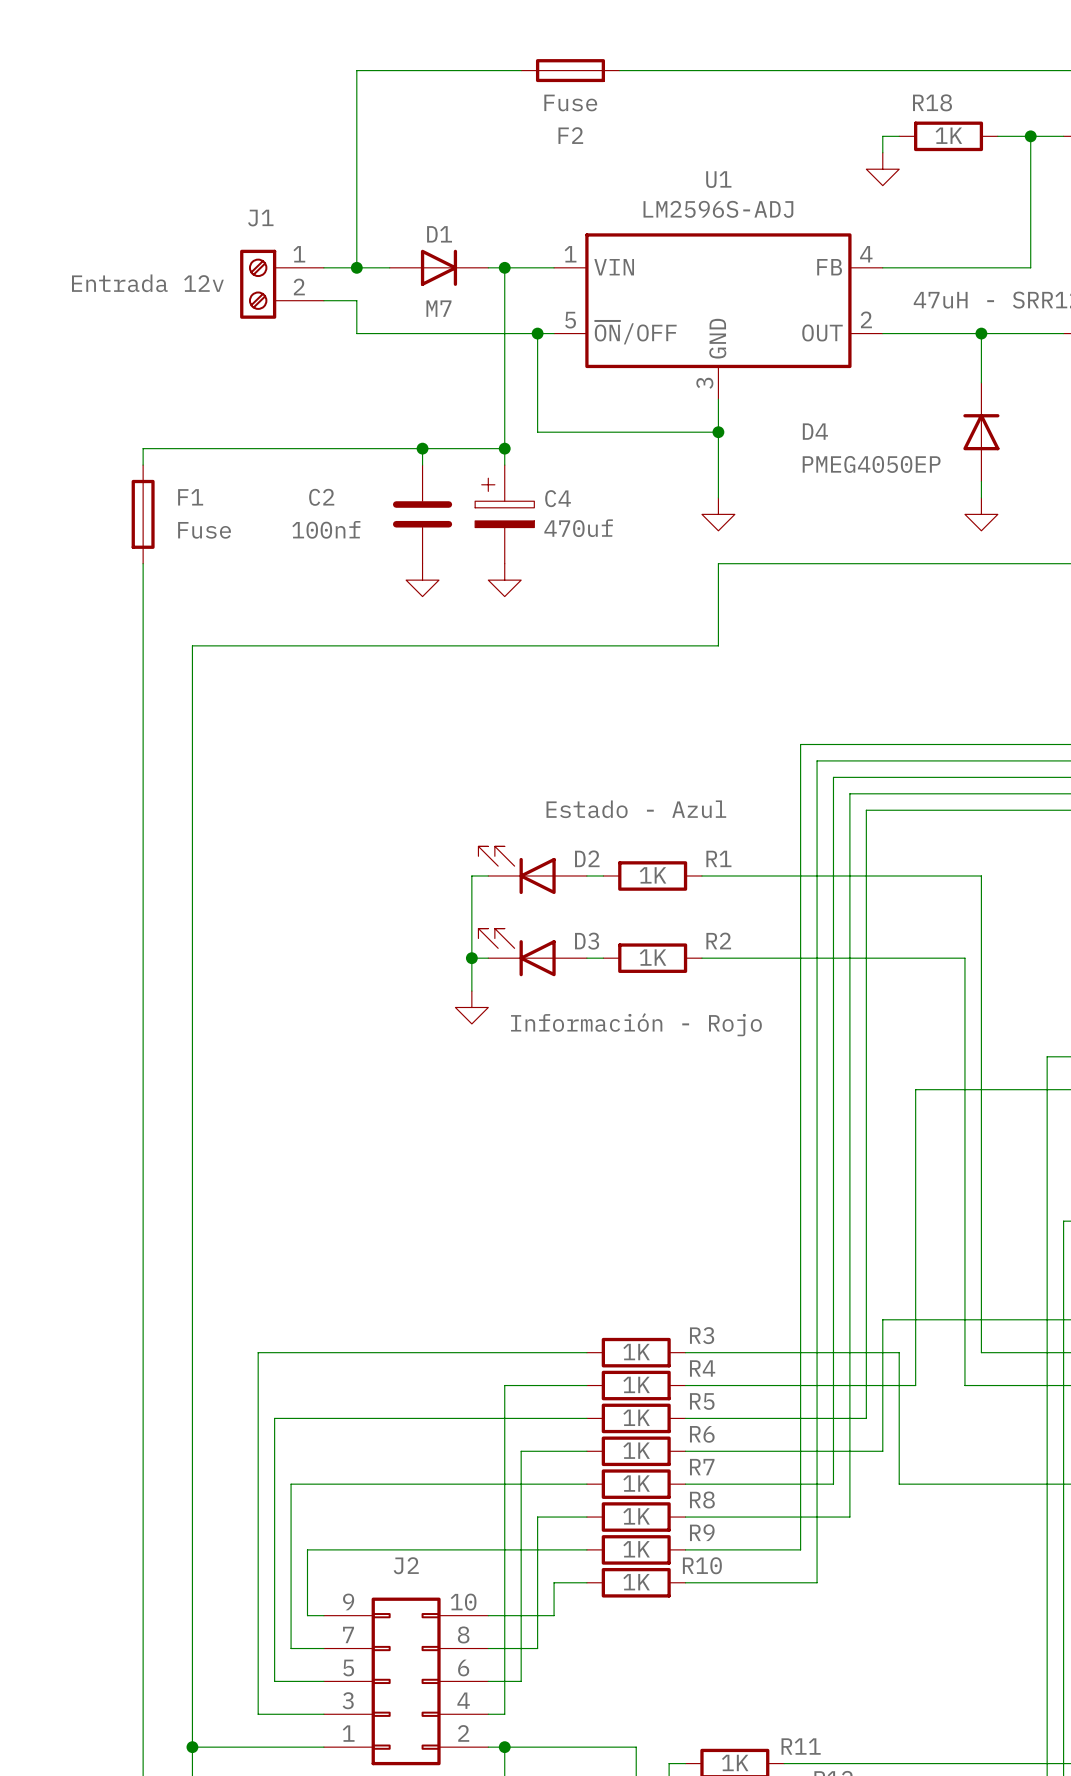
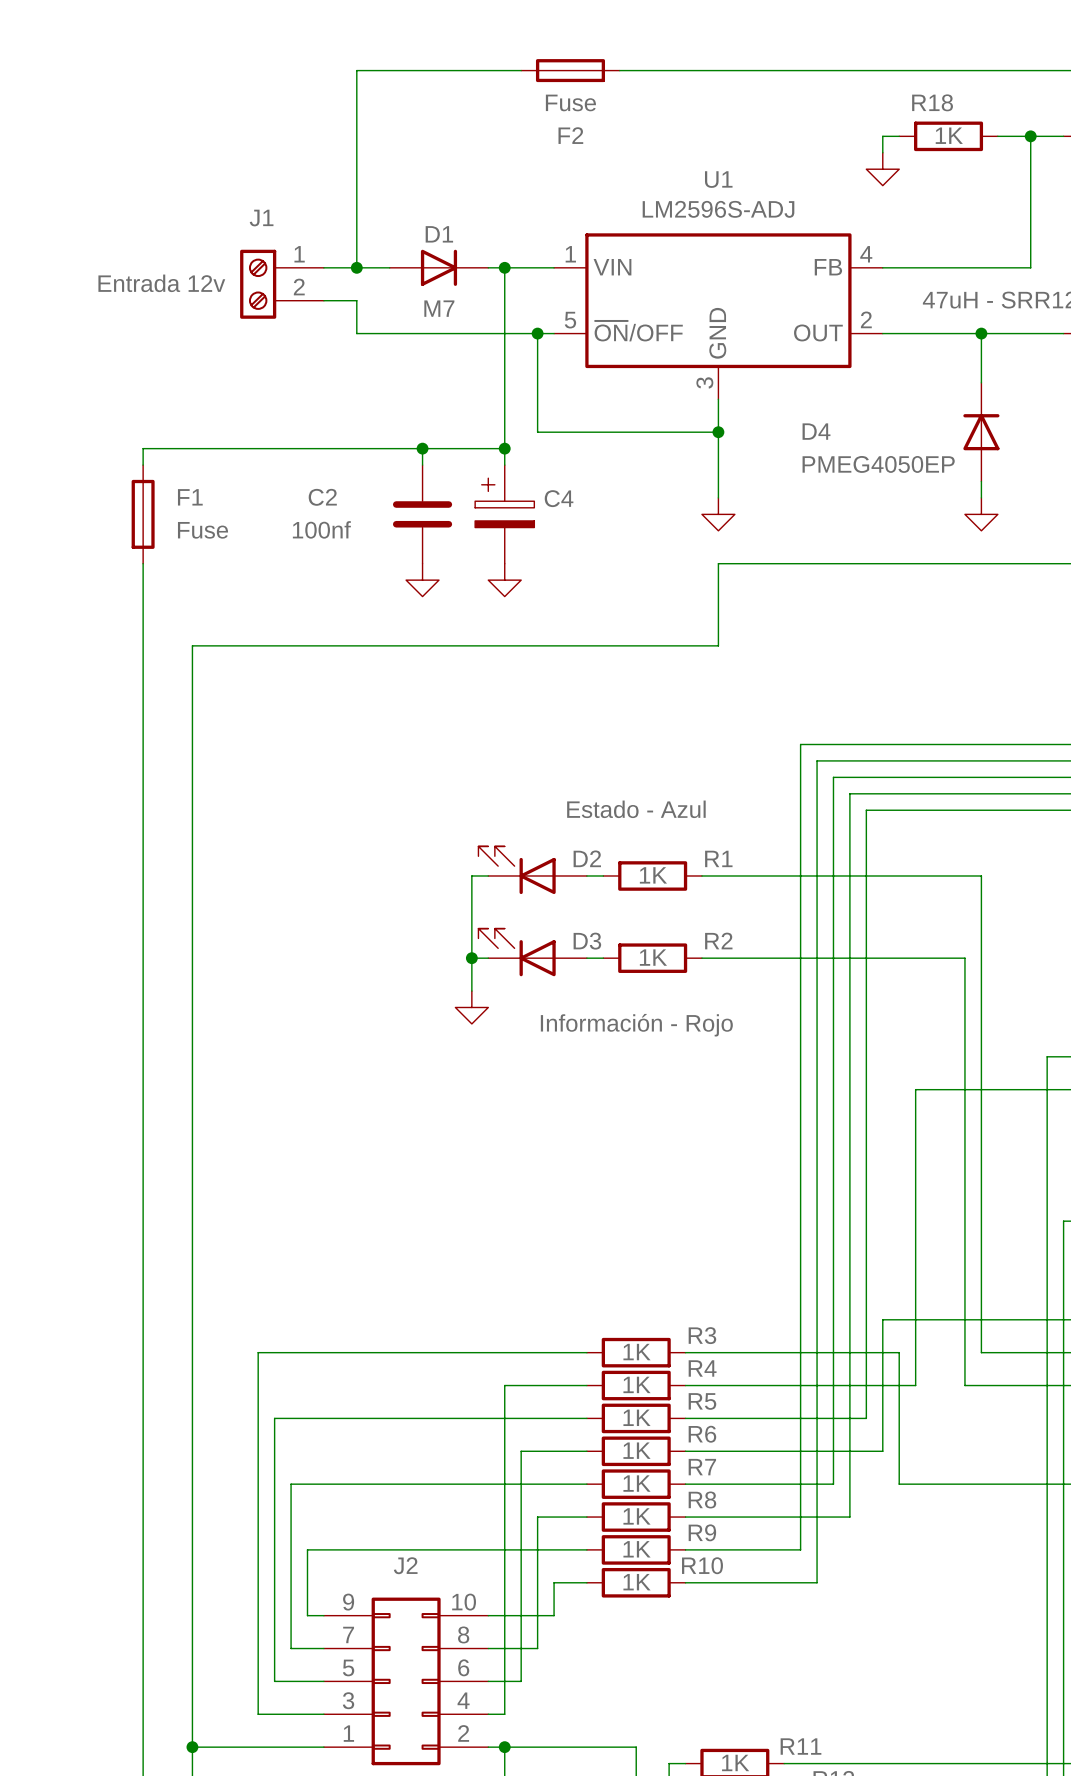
C4 value: 470uf (578, 528) -> none

